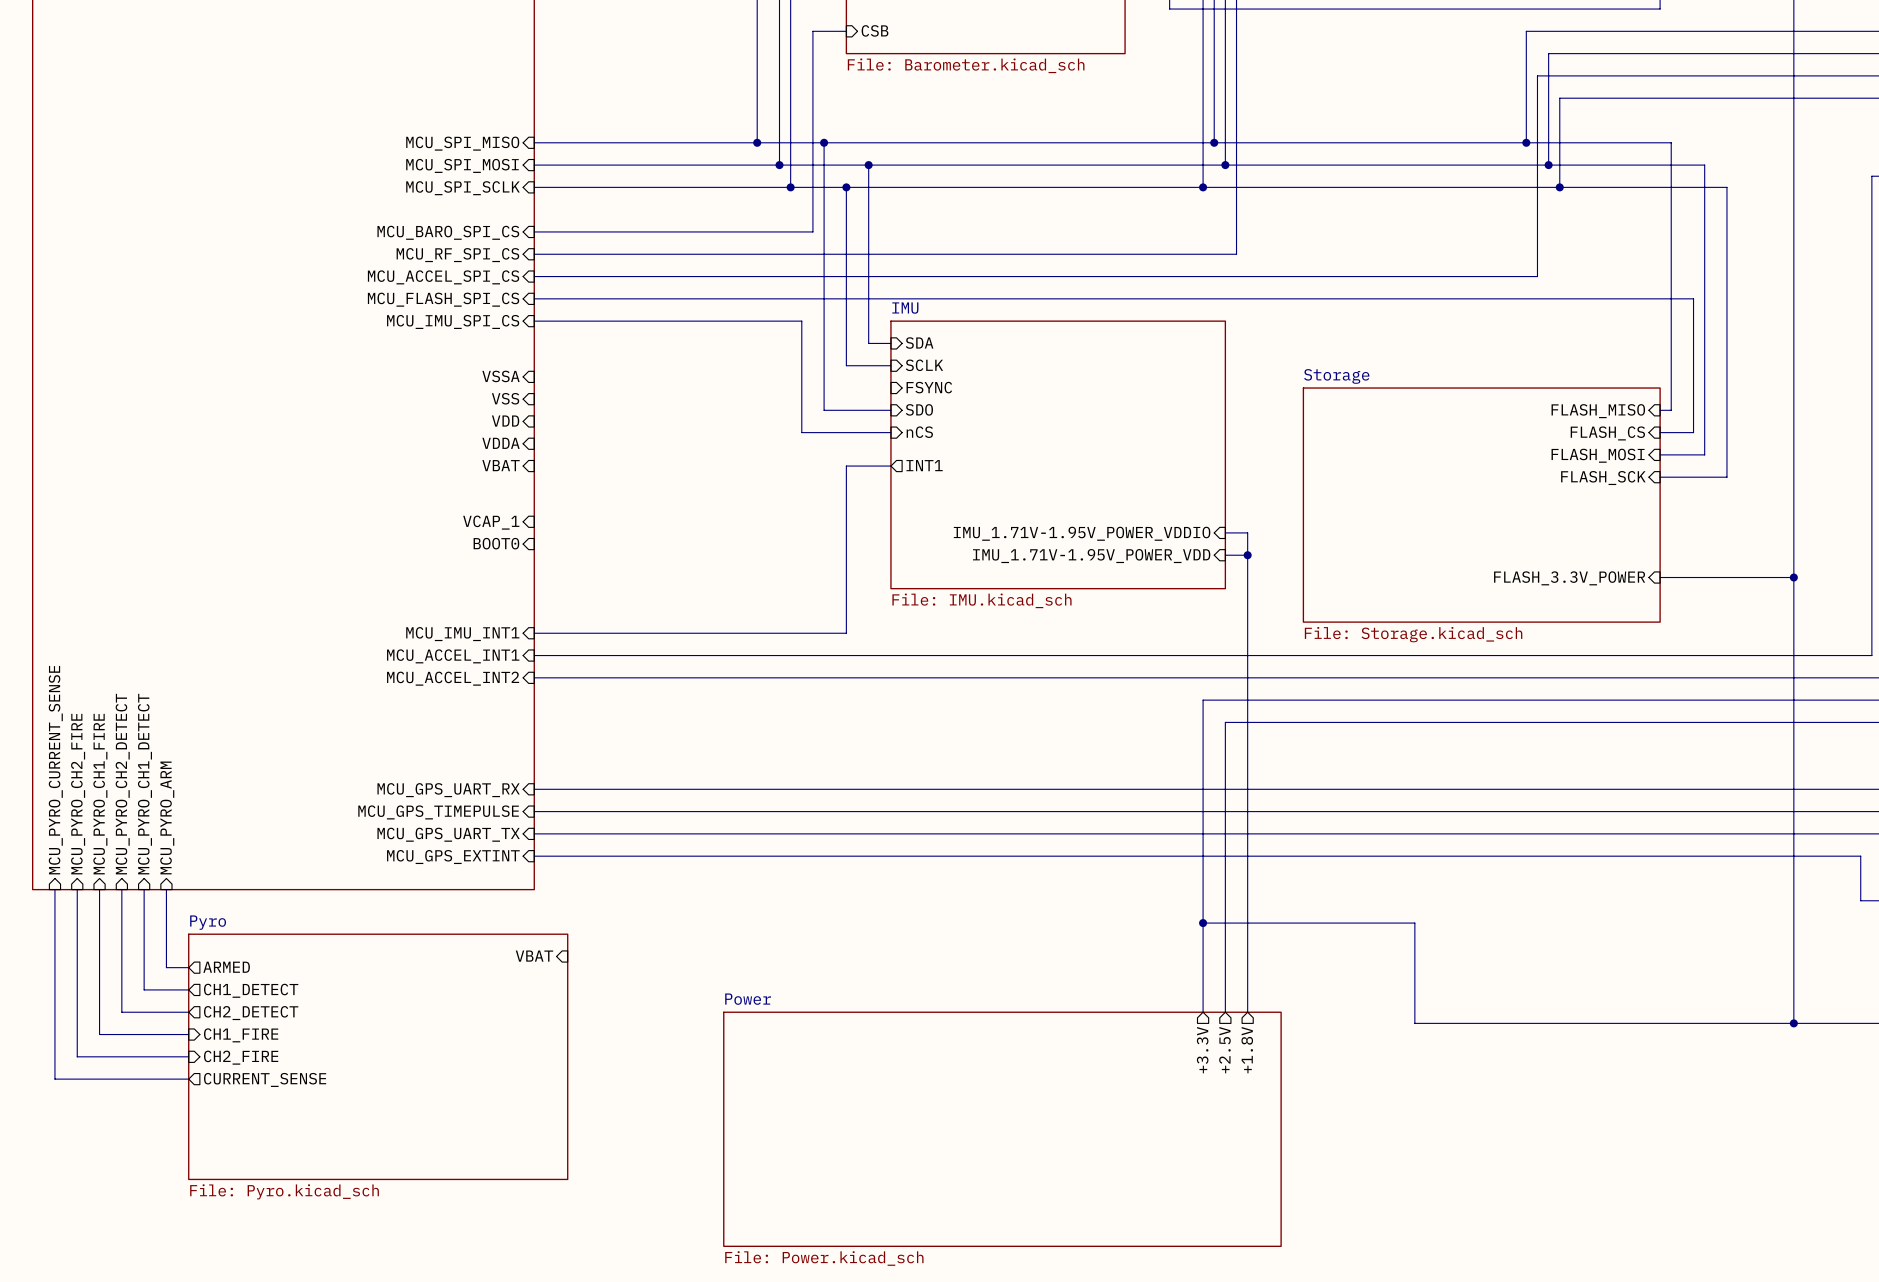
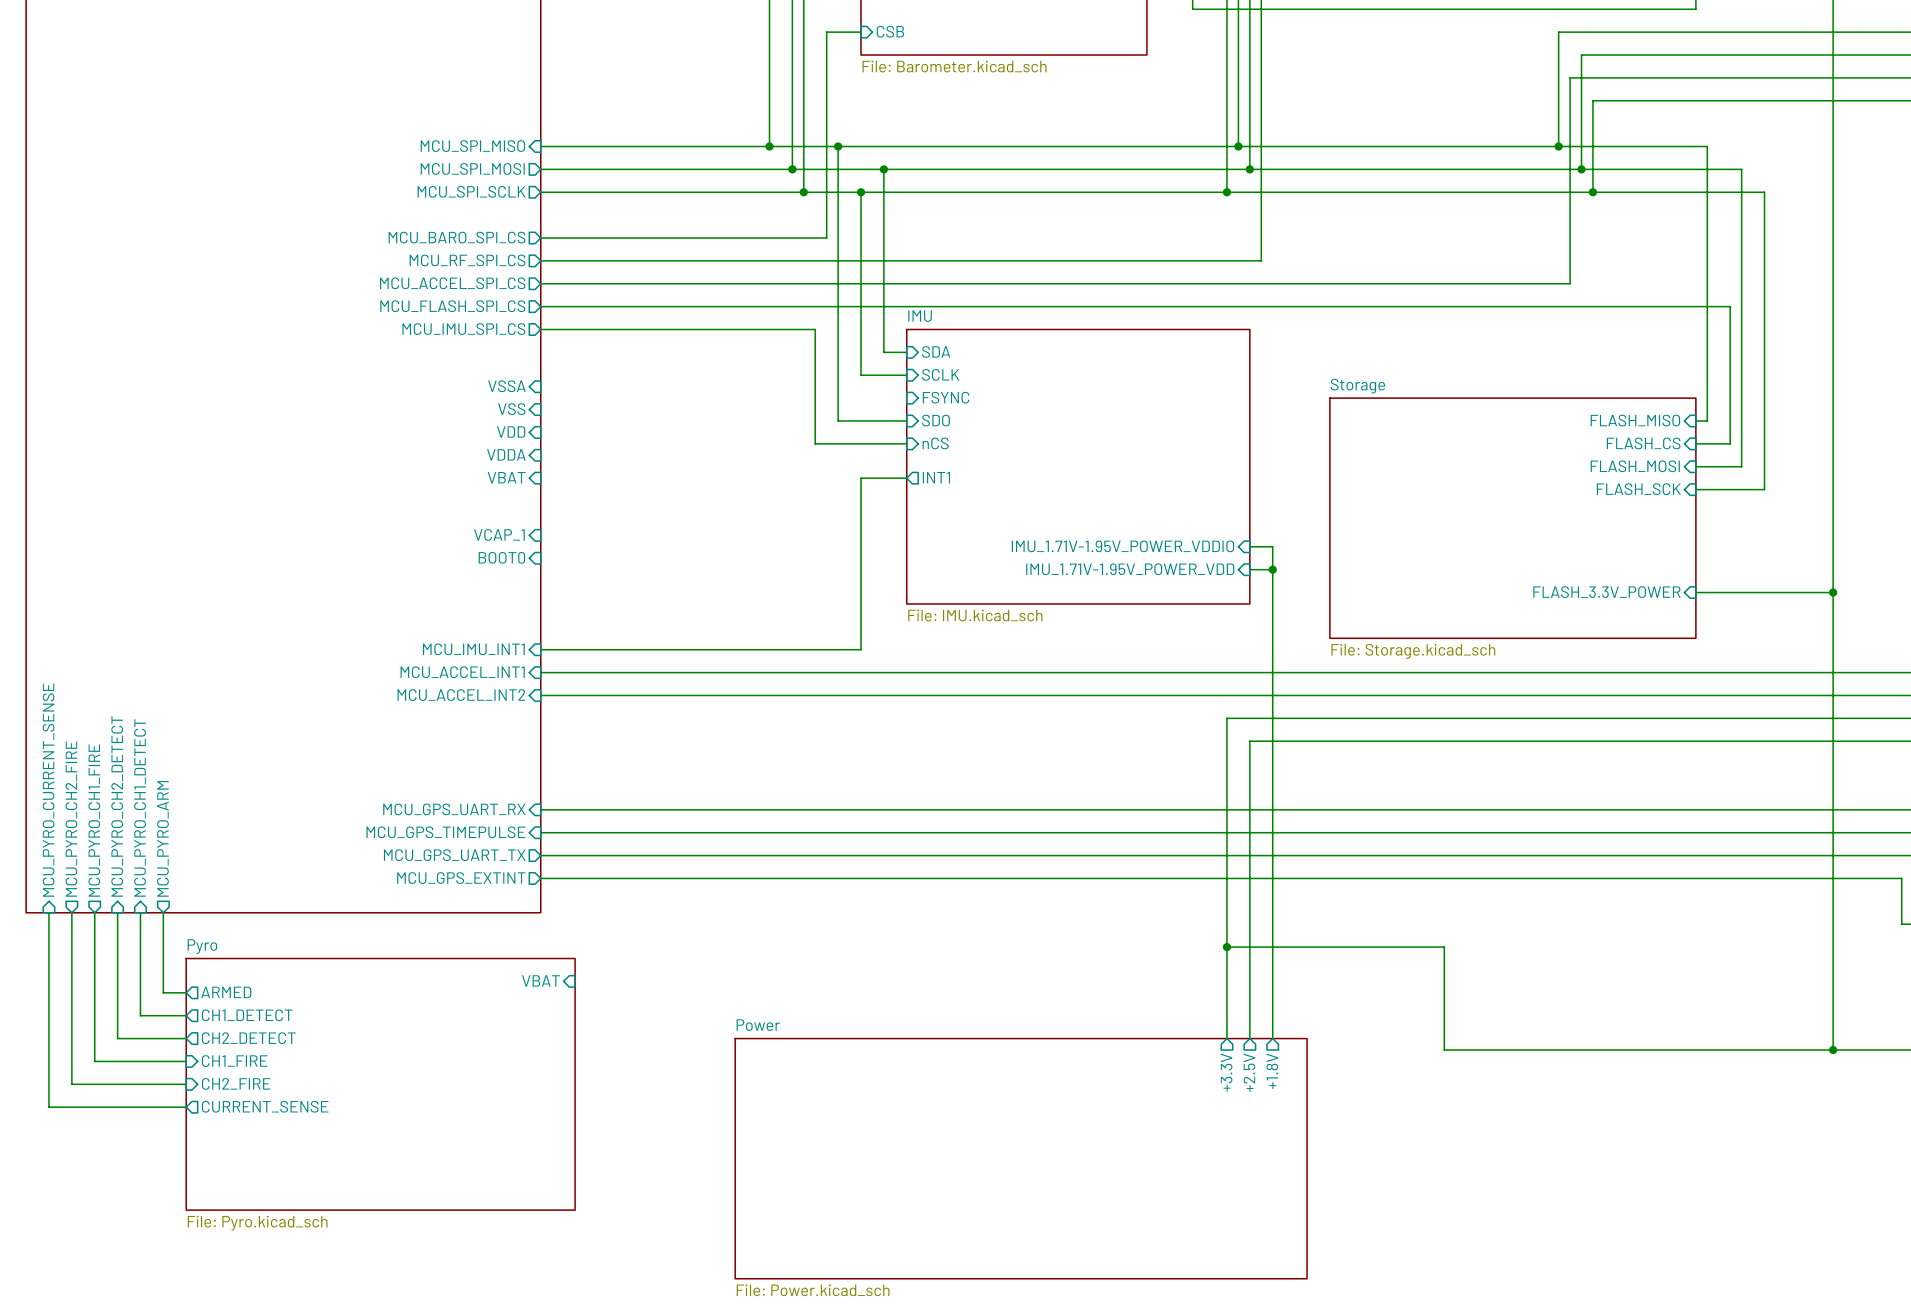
sheet pin shape: input (462, 165) -> output (472, 168)
sheet pin shape: input (462, 188) -> output (471, 191)
sheet pin shape: input (448, 232) -> output (457, 237)
sheet pin shape: input (457, 255) -> output (467, 260)
sheet pin shape: input (443, 277) -> output (452, 283)
sheet pin shape: input (443, 299) -> output (452, 306)
sheet pin shape: input (453, 321) -> output (463, 329)
sheet pin shape: input (78, 794) -> output (71, 819)
sheet pin shape: input (100, 794) -> output (94, 820)
sheet pin shape: input (167, 817) -> output (162, 838)
sheet pin shape: input (448, 834) -> output (454, 855)
sheet pin shape: input (453, 857) -> output (461, 878)

